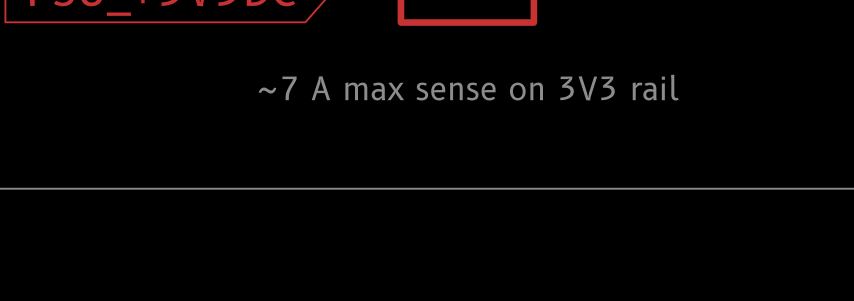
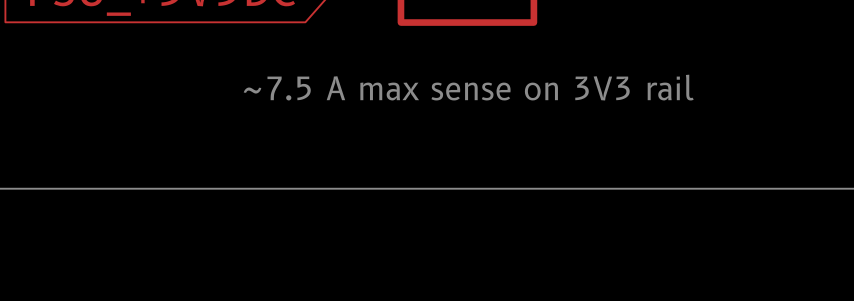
text: ~7 A max sense on 3V3 rail (468, 87) -> ~7.5 A max sense on 3V3 rail (468, 87)

